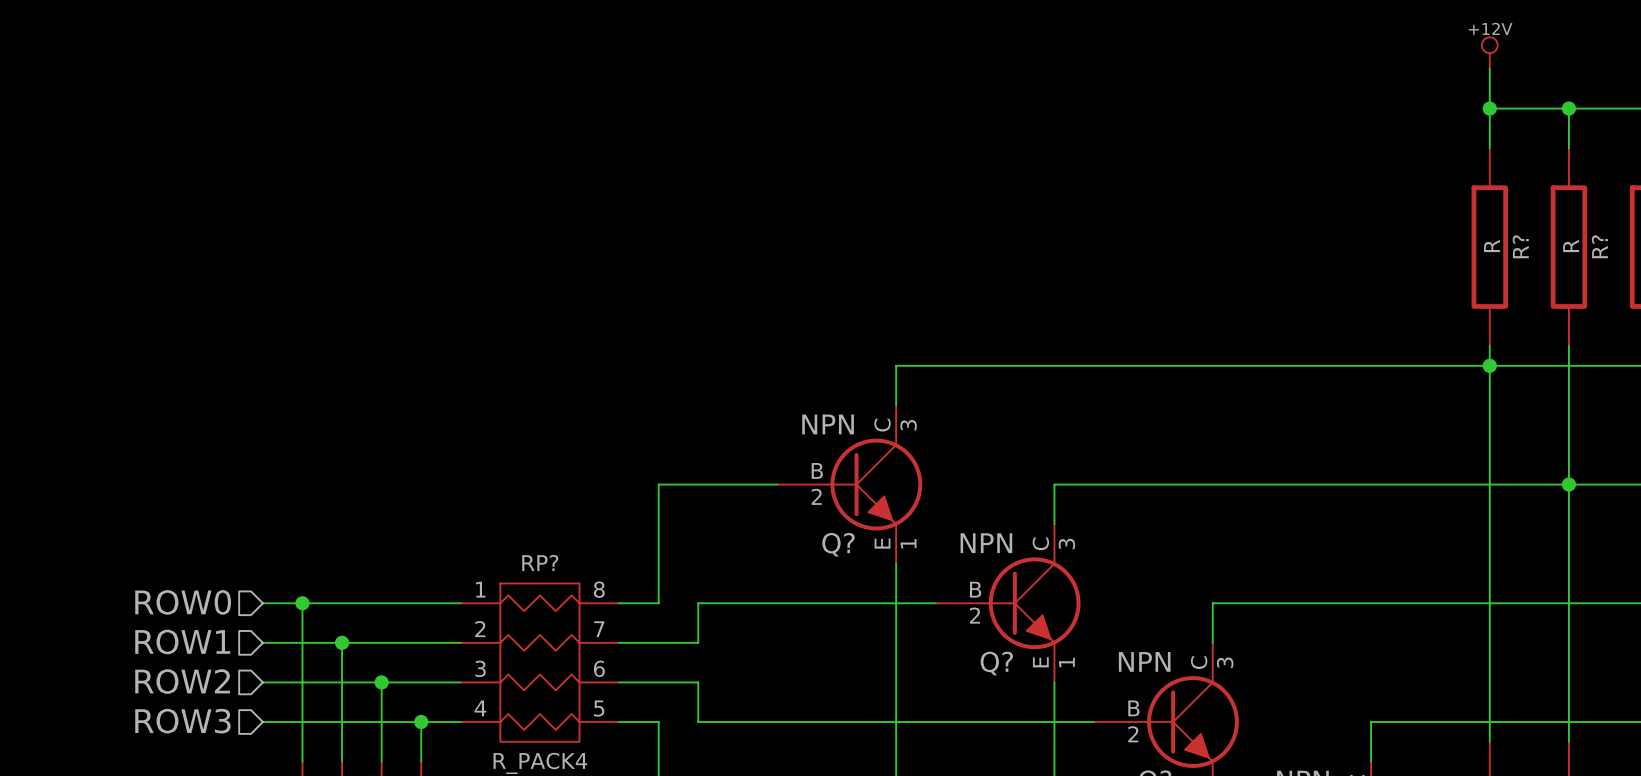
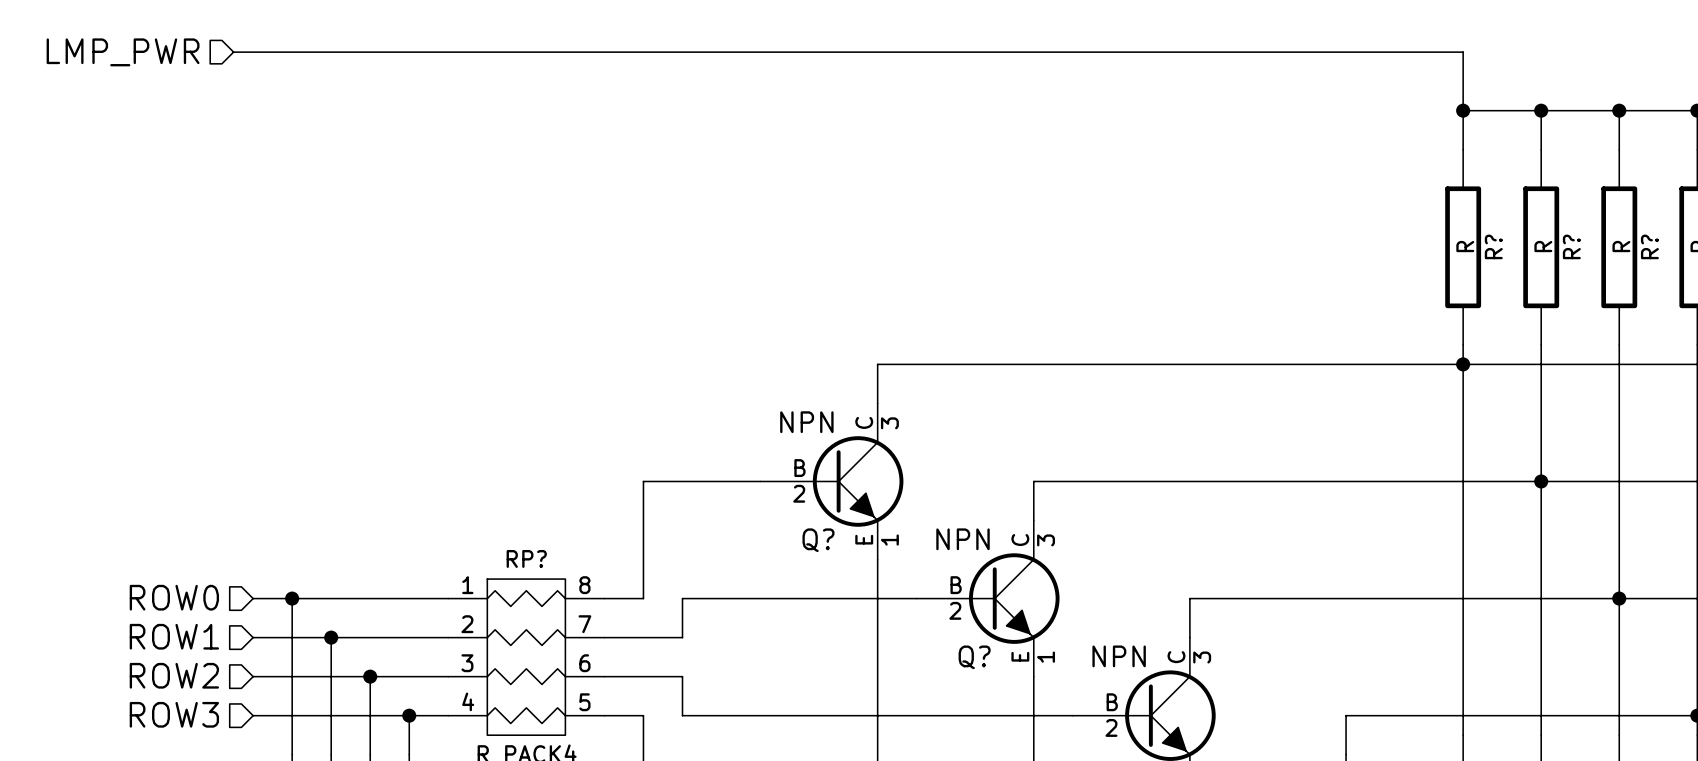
wire: none -> (233, 52) (1463, 52) (1463, 71)
hierarchical label: none -> LMP_PWR (123, 52)
power symbol: +12V (1489, 53) -> none

